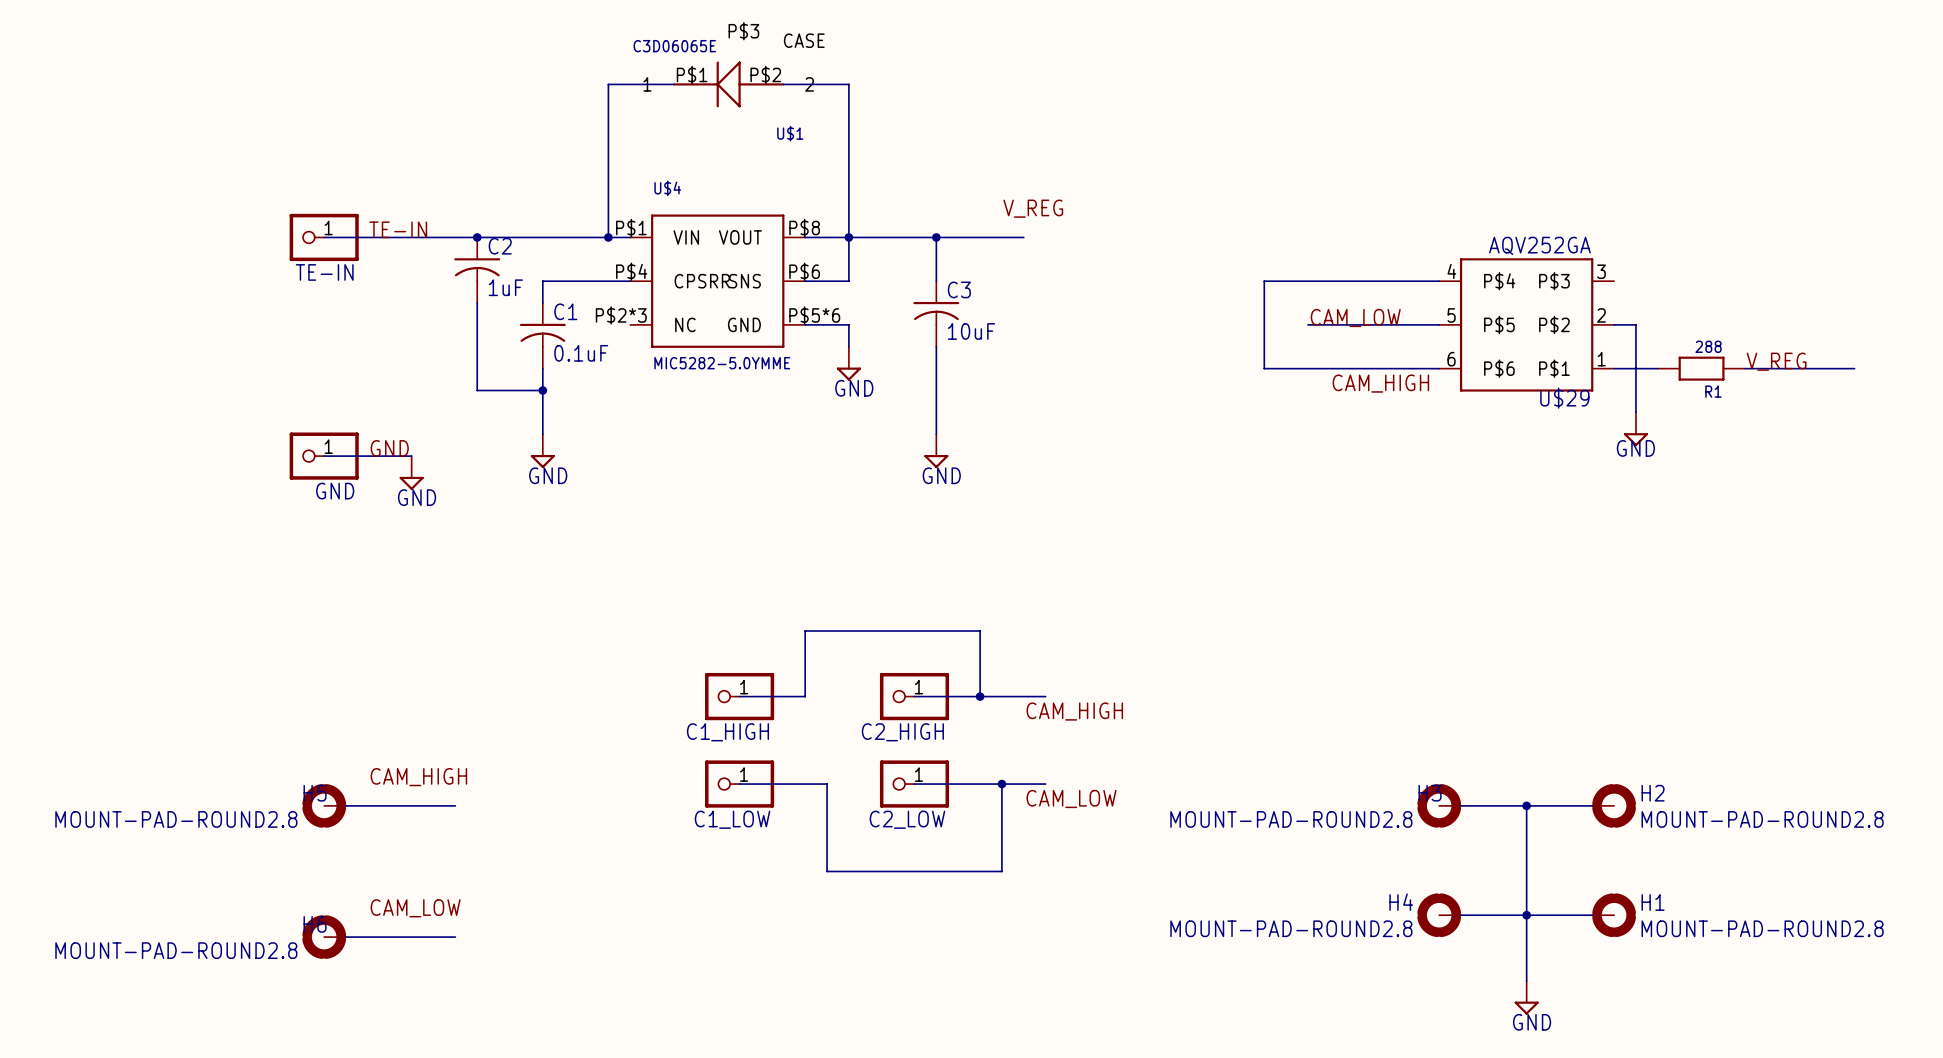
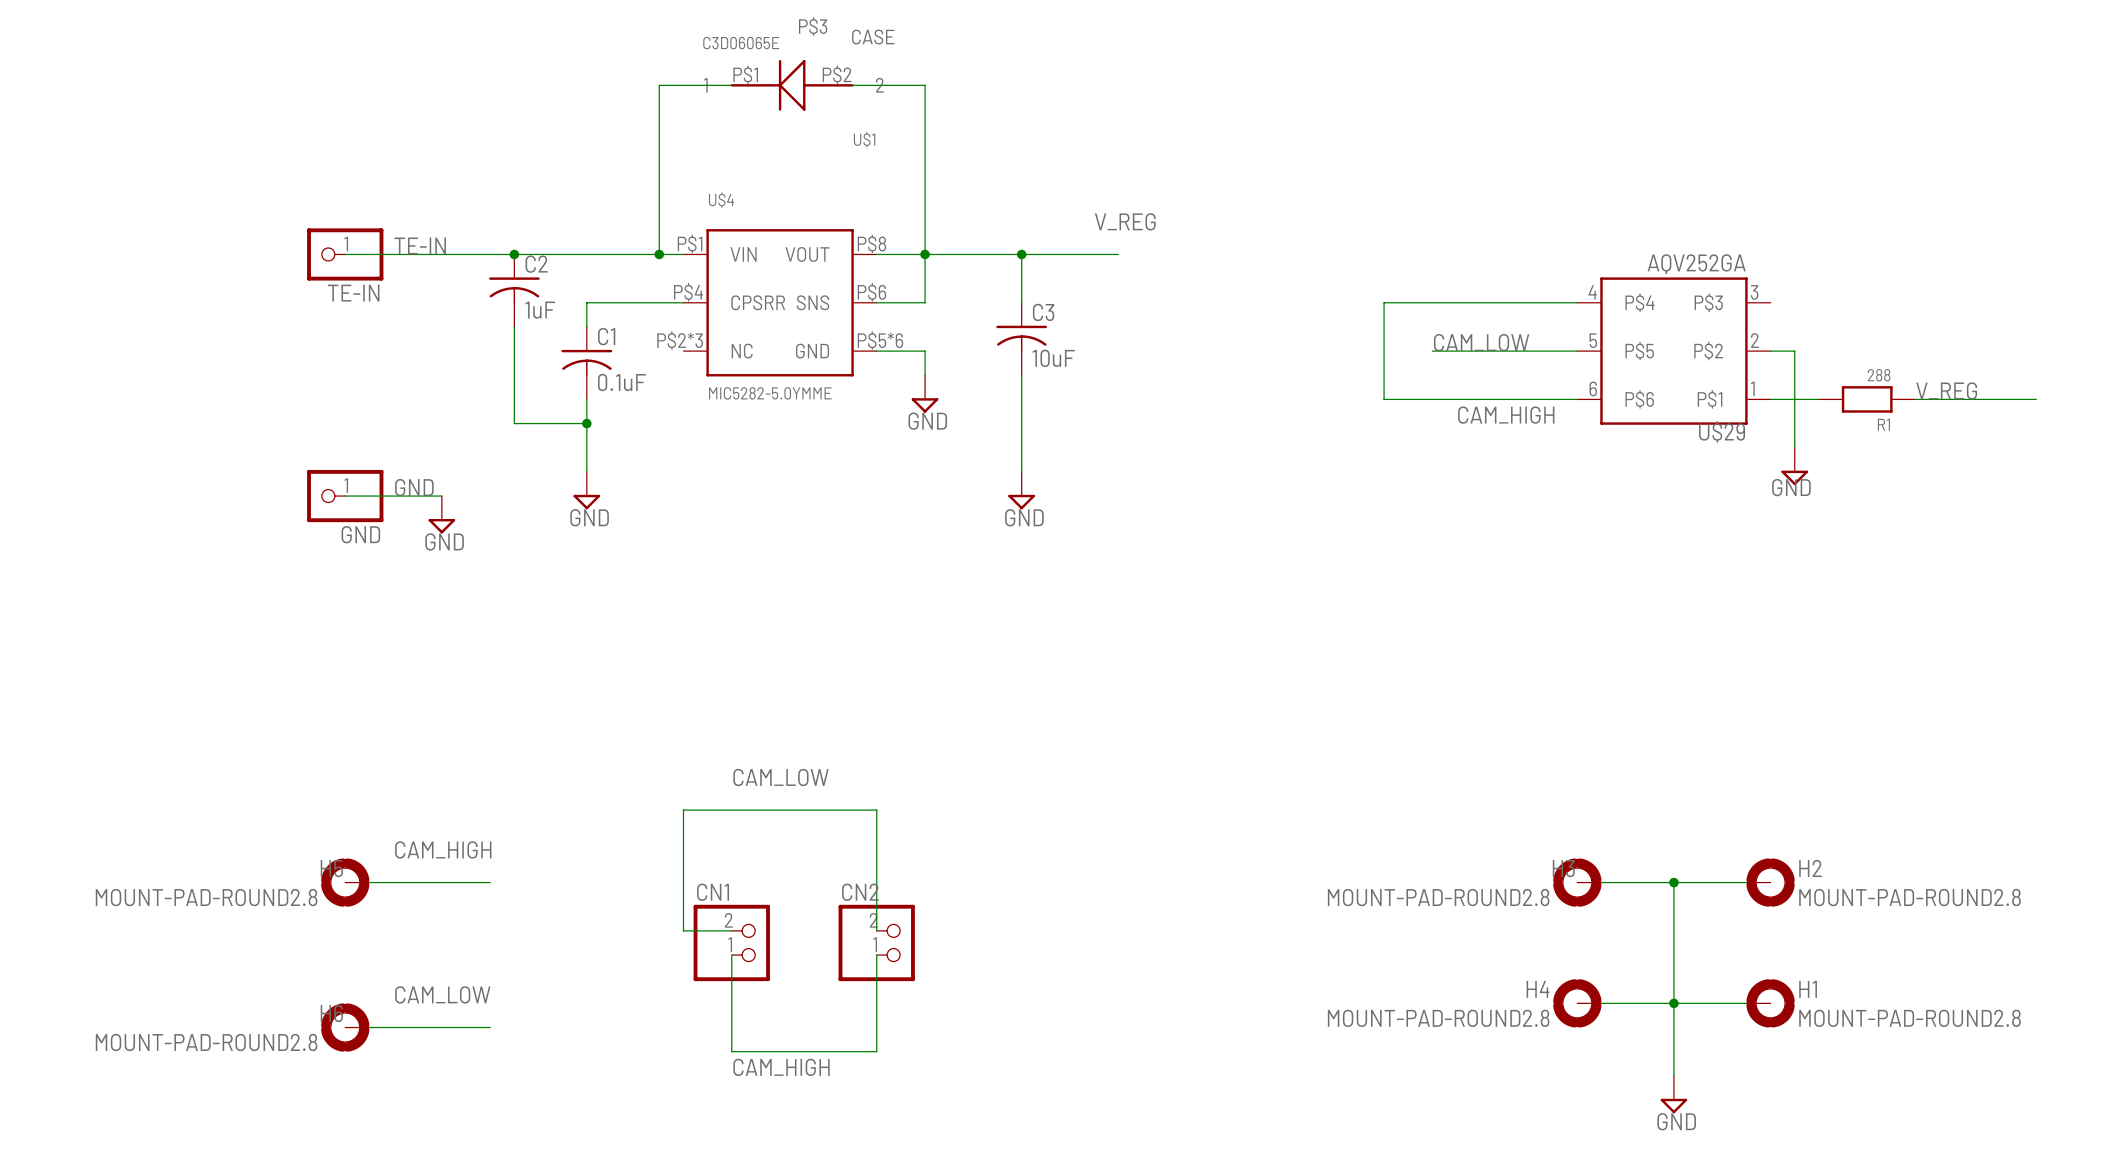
wire: (739, 696) (805, 696) (805, 631) (980, 631) (980, 696) -> none
C1_HIGH: (739, 696) -> none
wire: (914, 696) (1045, 696) -> none
C2_HIGH: (914, 696) -> none
junction: (980, 696) -> none
label: none -> CAM_LOW (780, 777)
label: CAM_HIGH (1074, 711) -> none
wire: (739, 784) (827, 784) (827, 871) (1001, 871) (1001, 784) -> none
C1_LOW: (739, 784) -> none
wire: (914, 784) (1045, 784) -> none
C2_LOW: (914, 784) -> none
junction: (1001, 784) -> none
label: CAM_LOW (1071, 798) -> none
wire: none -> (731, 930) (683, 930) (683, 810) (876, 810) (876, 930)
CN1: none -> (731, 942)
CN2: none -> (876, 942)
wire: none -> (731, 955) (731, 1051) (876, 1051) (876, 955)
label: none -> CAM_HIGH (781, 1067)

